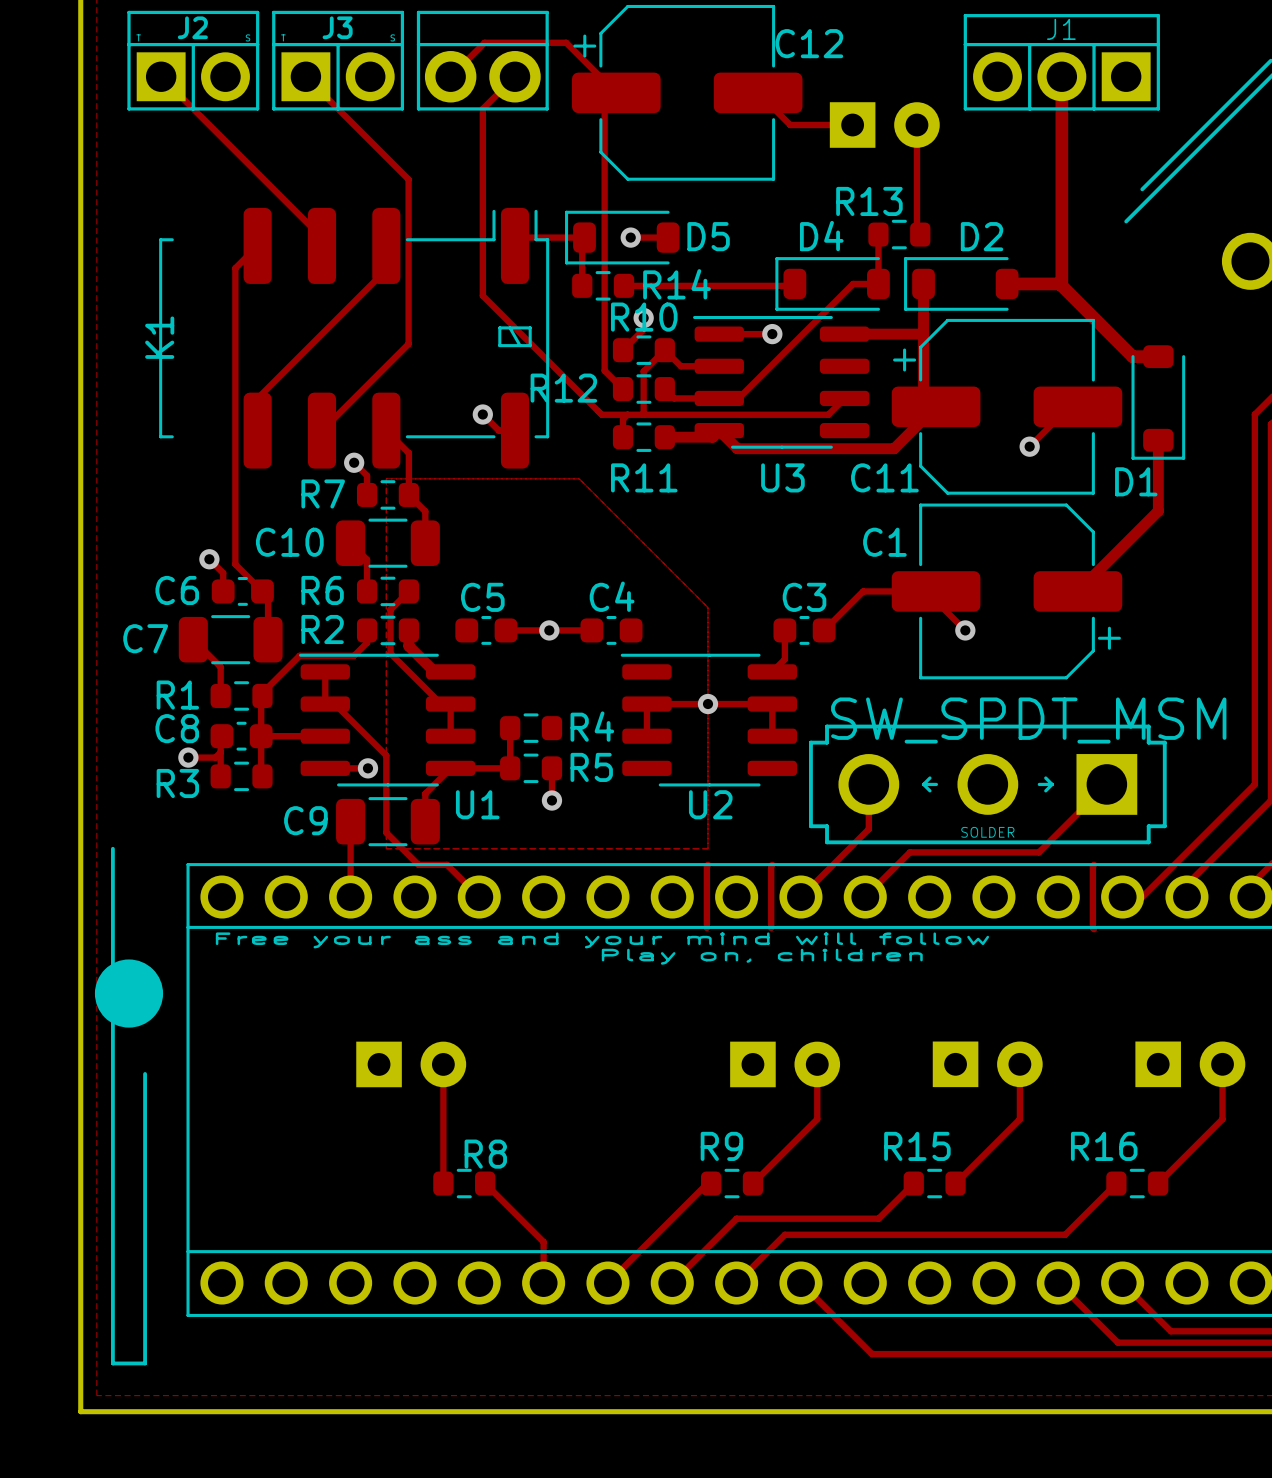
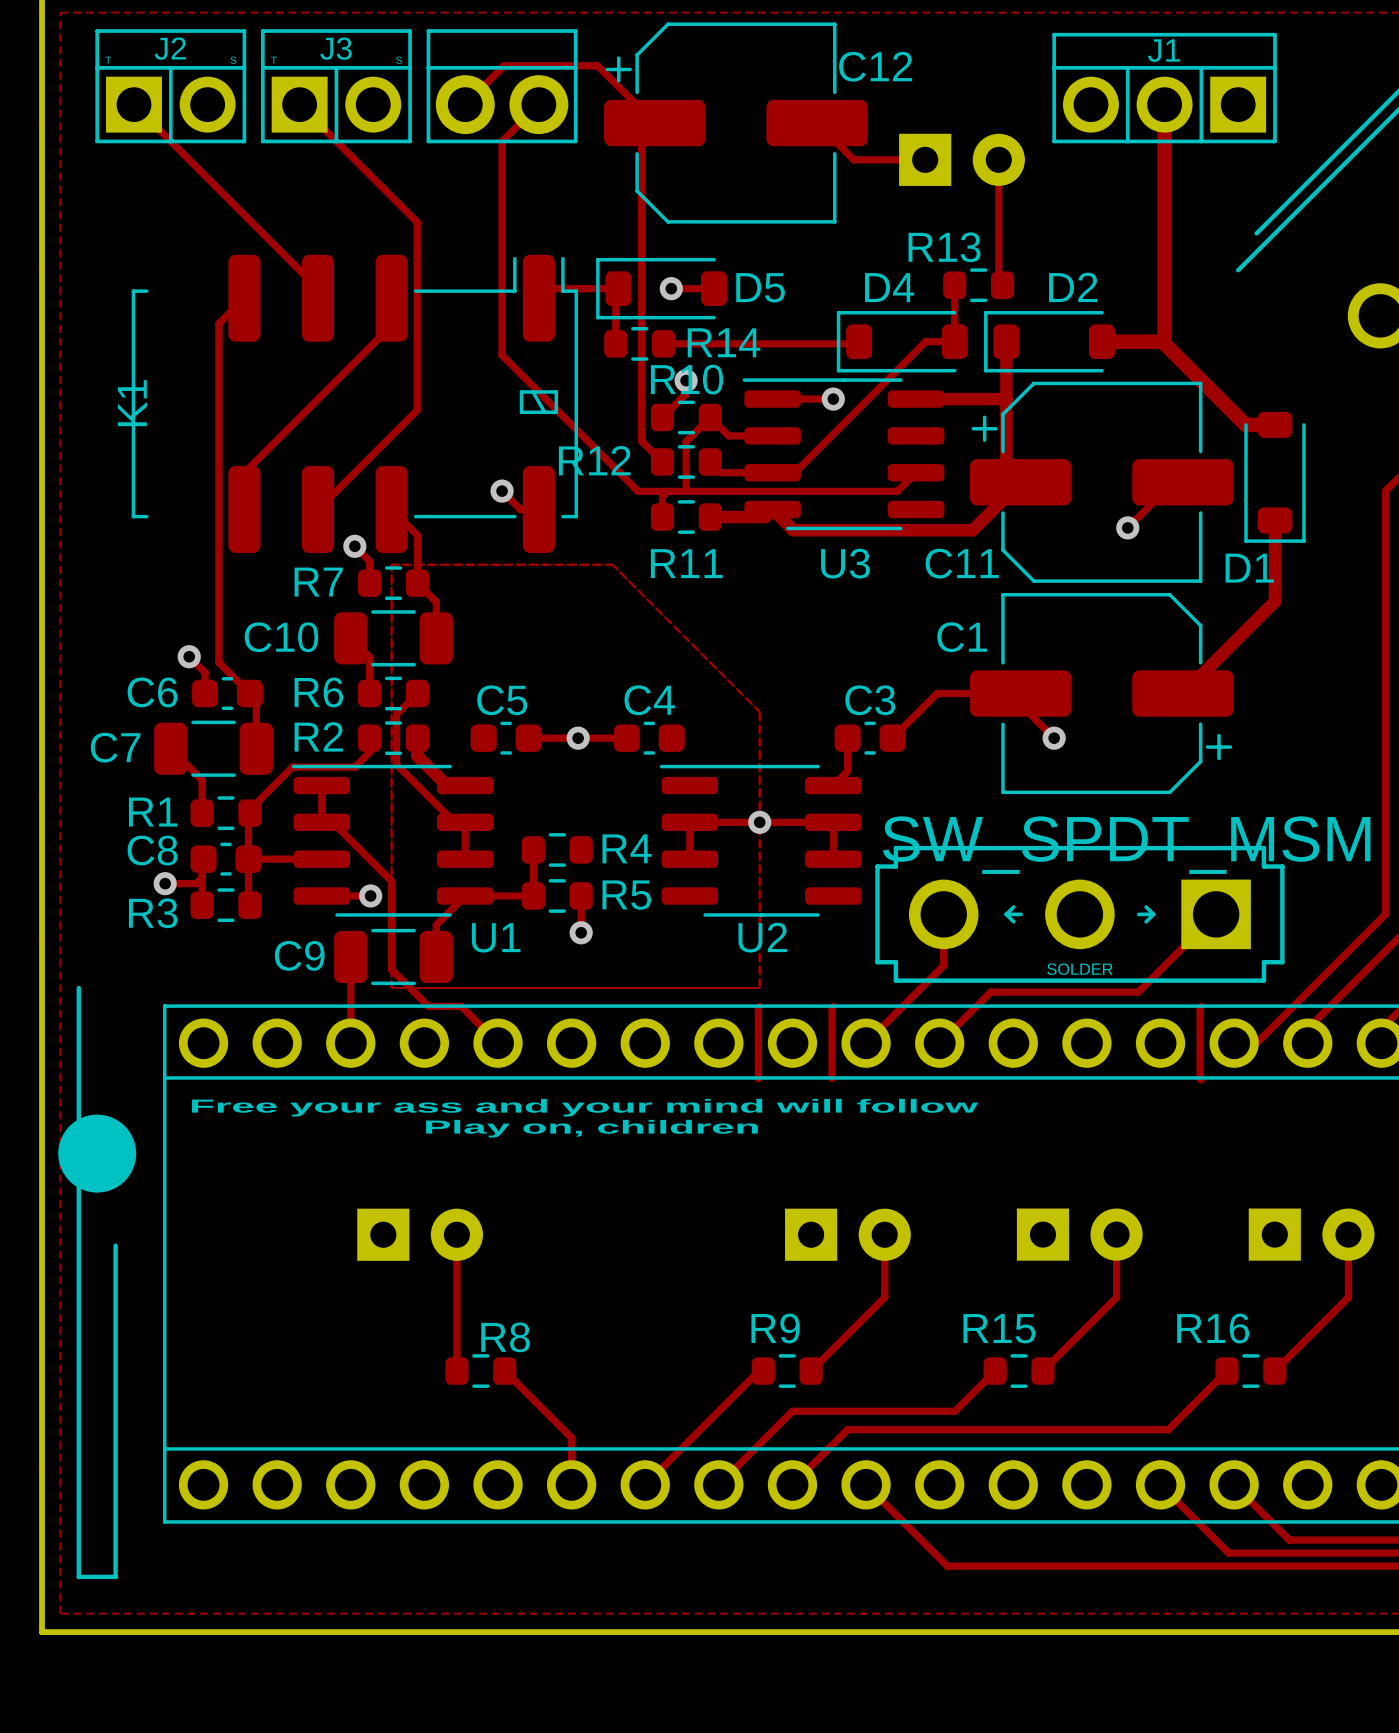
text position: Free your ass and your mind will follow (602, 940) -> Free your ass and your mind will follow (585, 1107)
text position: Play on, children (762, 956) -> Play on, children (591, 1128)

